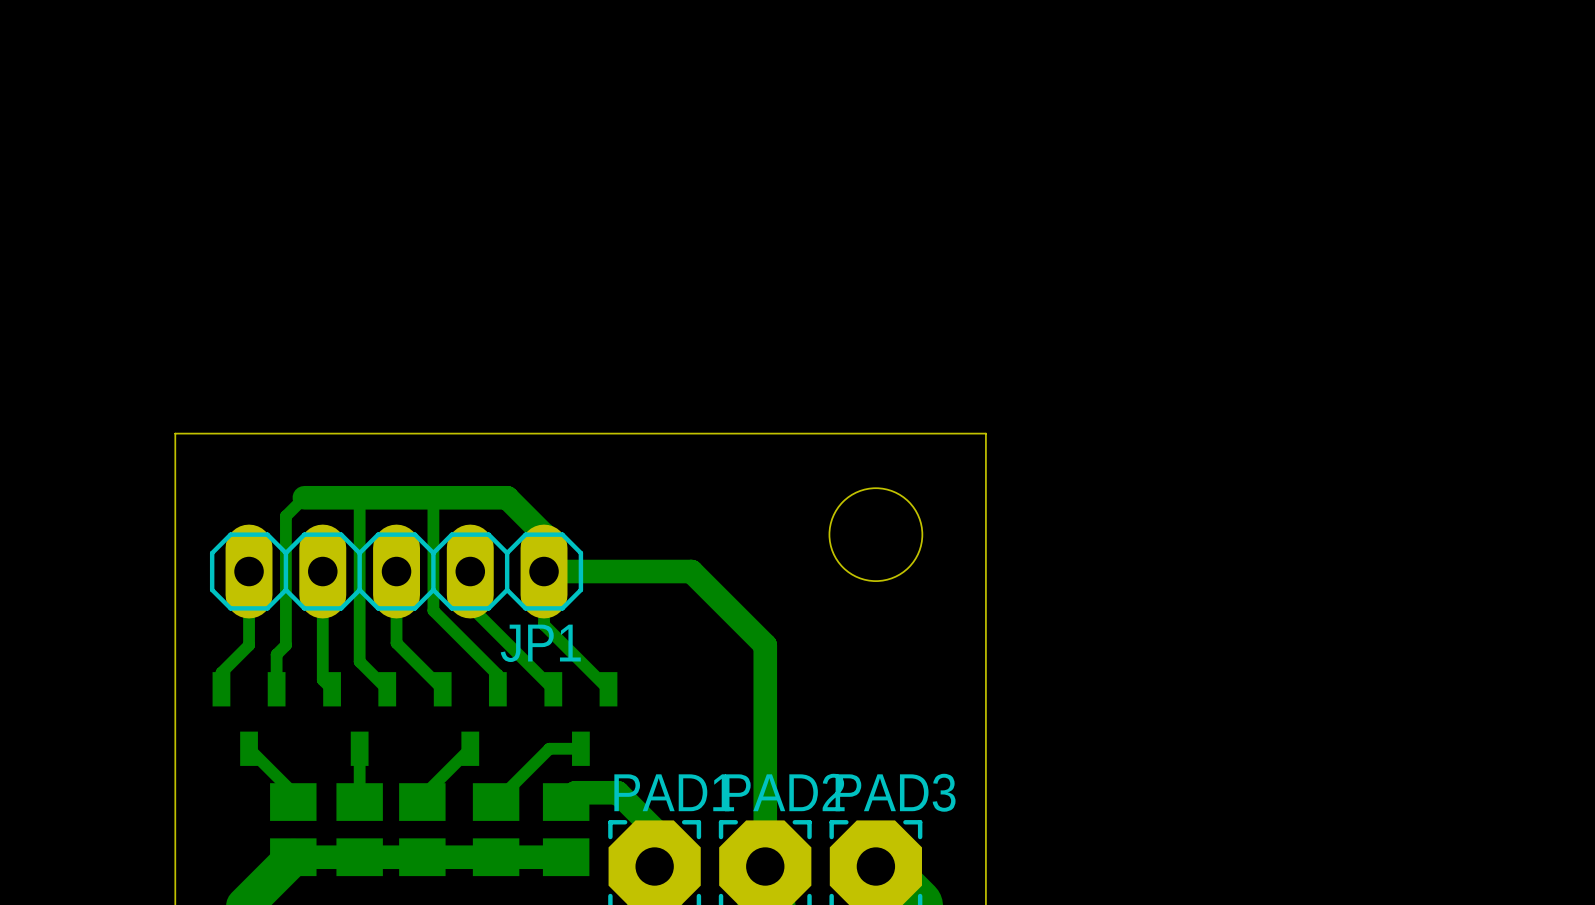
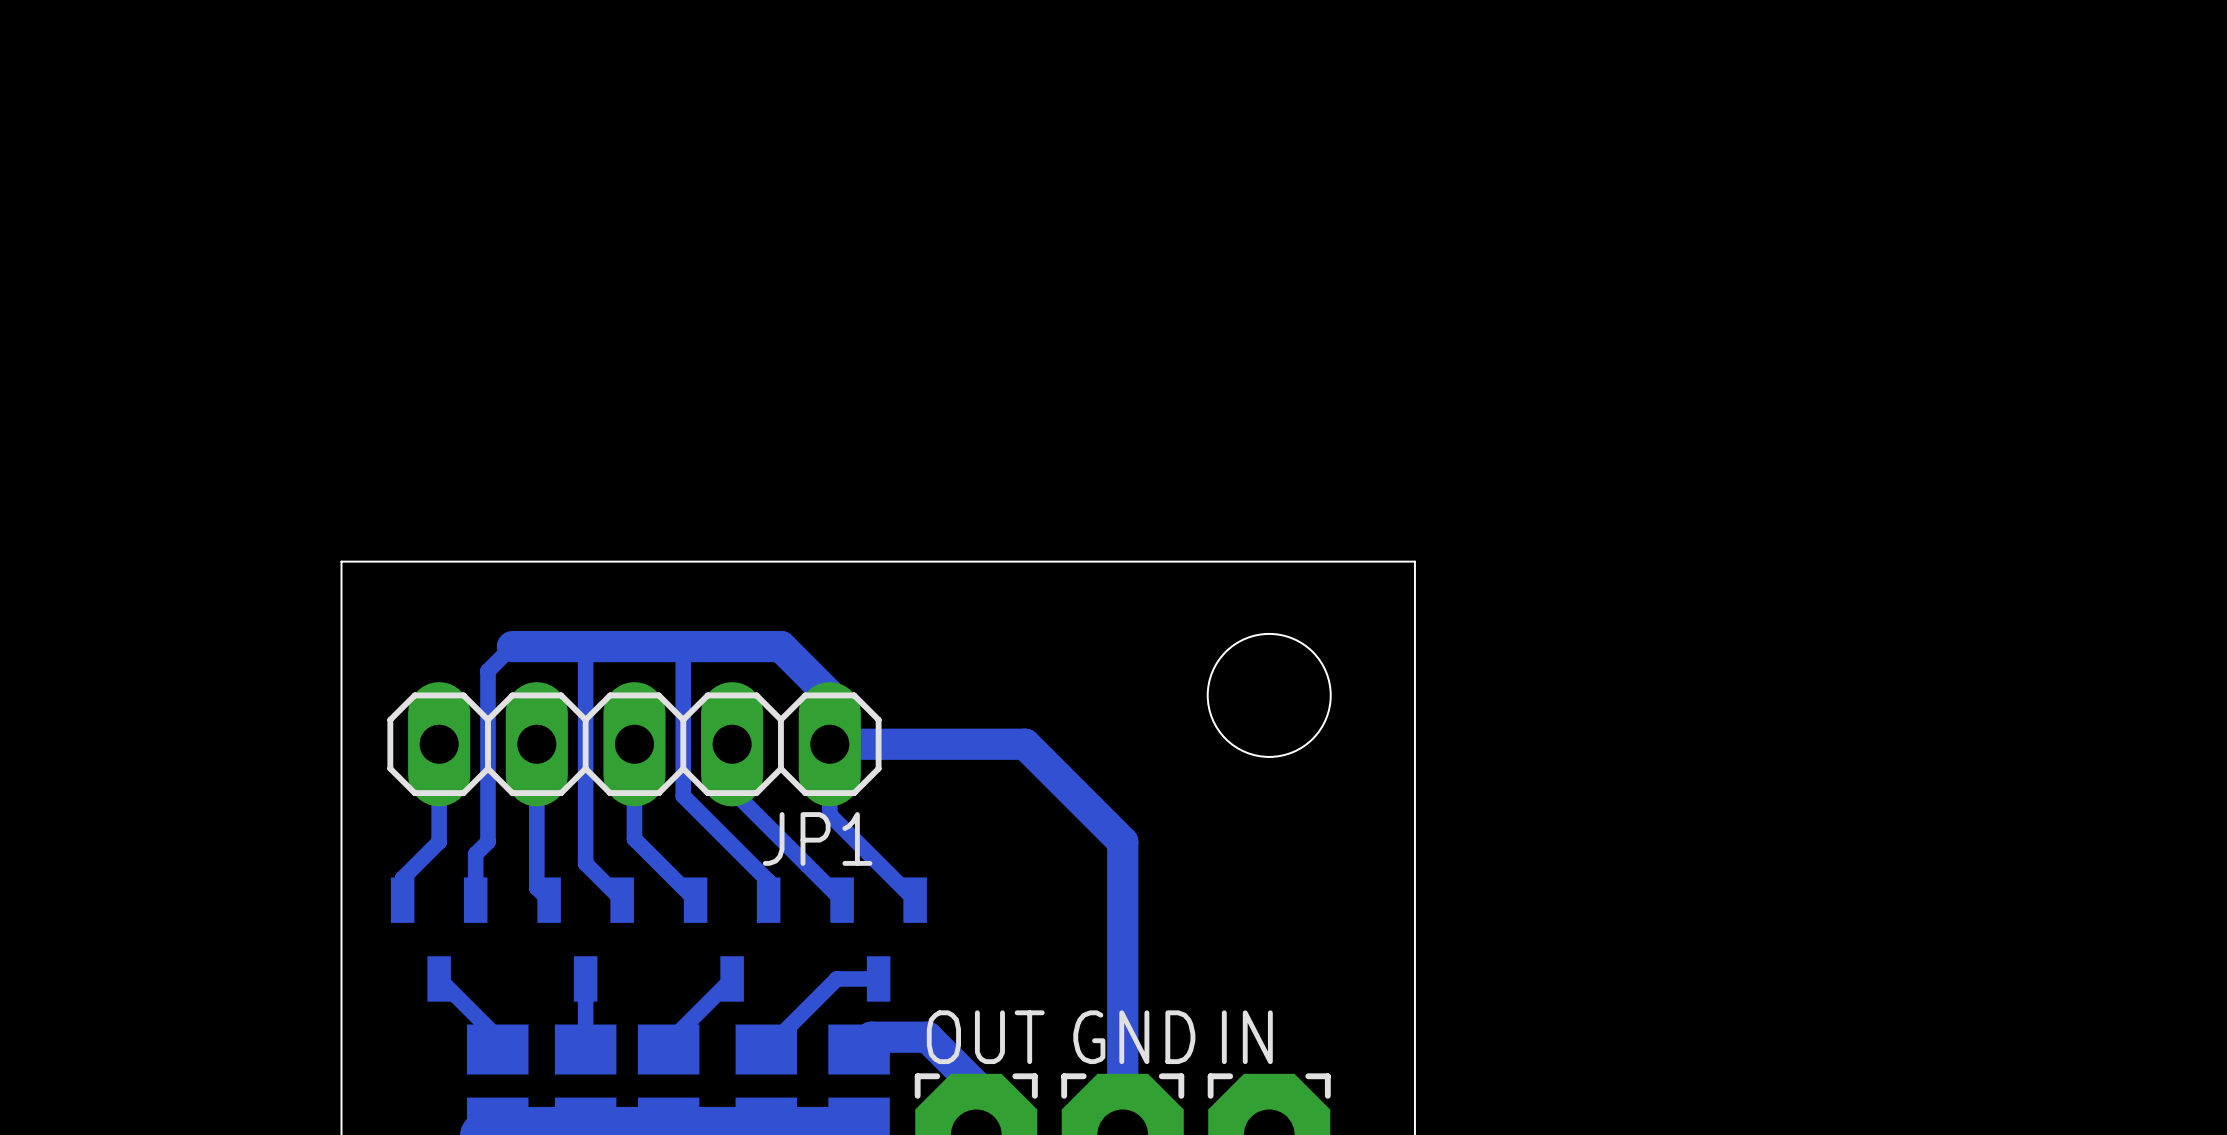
PAD1 name: PAD1 (674, 792) -> OUT (985, 1037)
PAD2 name: PAD2 (784, 792) -> GND (1134, 1037)
PAD3 name: PAD3 (895, 792) -> IN (1247, 1037)

